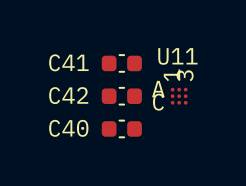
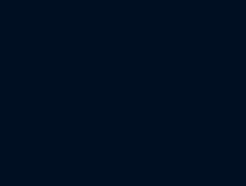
C41: (121, 63) -> none
C42: (121, 96) -> none
U11: (179, 96) -> none
C40: (121, 128) -> none

